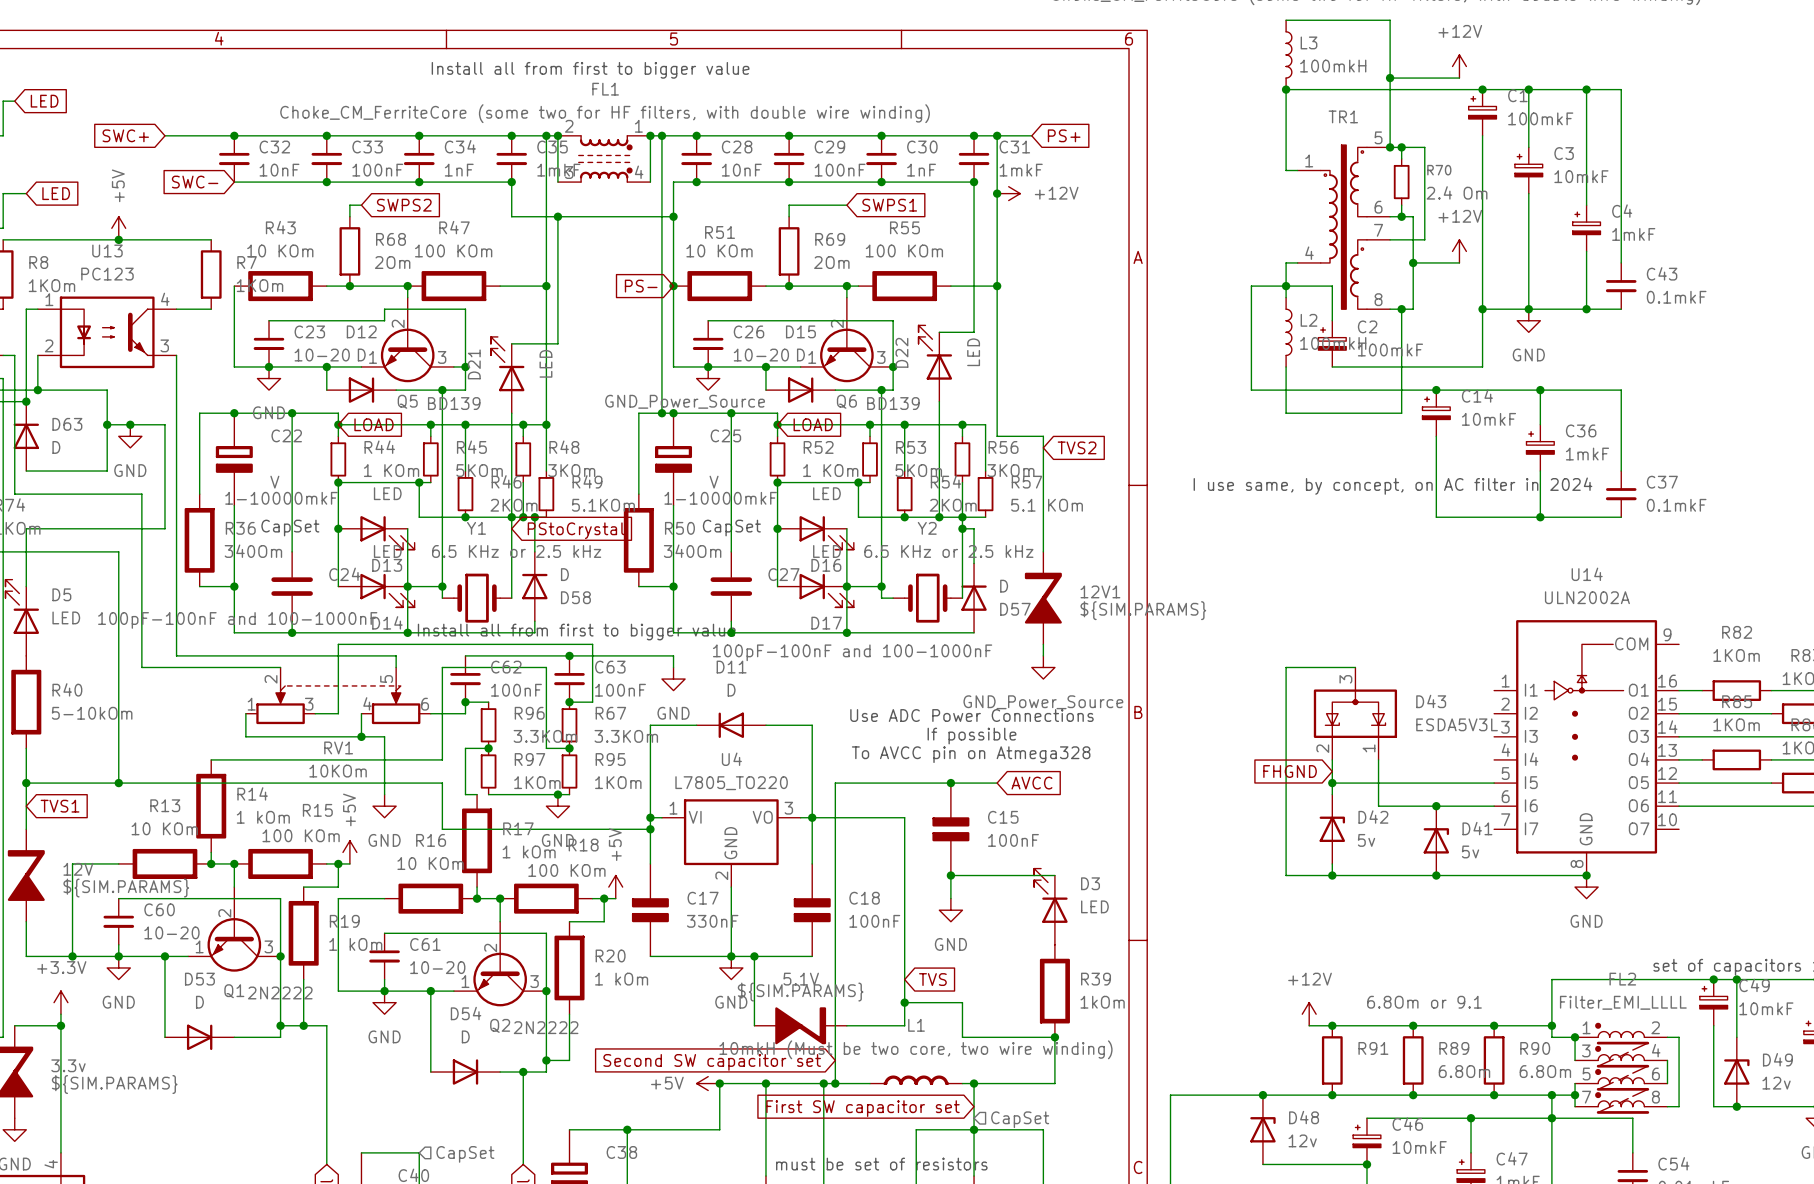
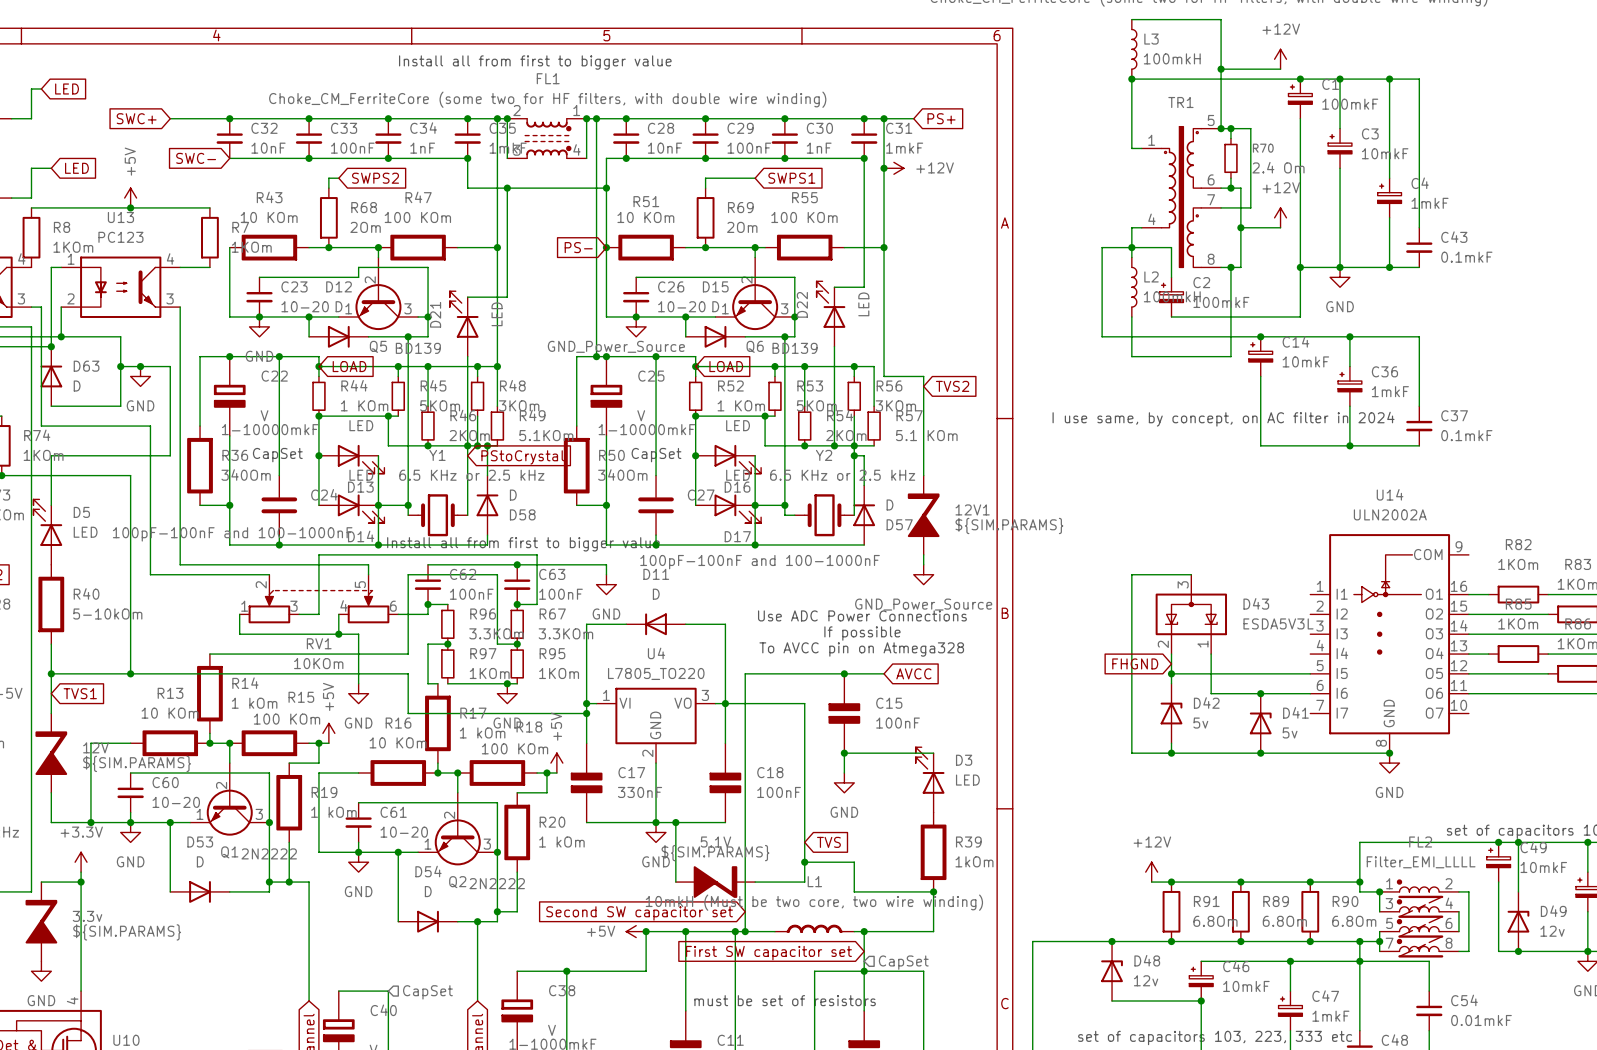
R91 value: 6.8Om or 9.1 (1424, 1002) -> 6.8Om (1215, 921)

